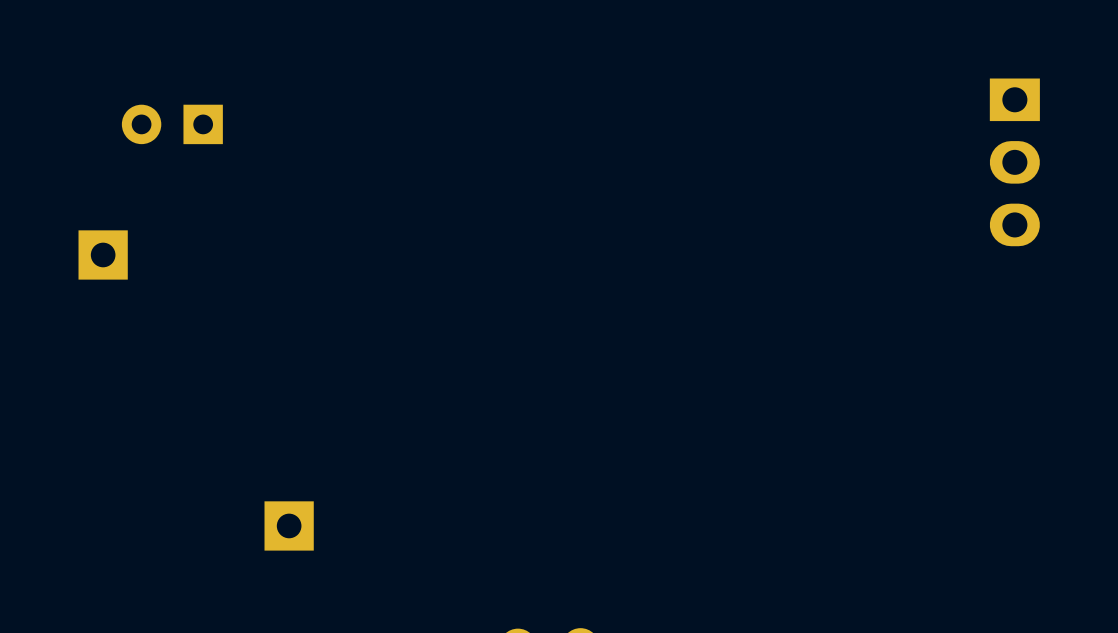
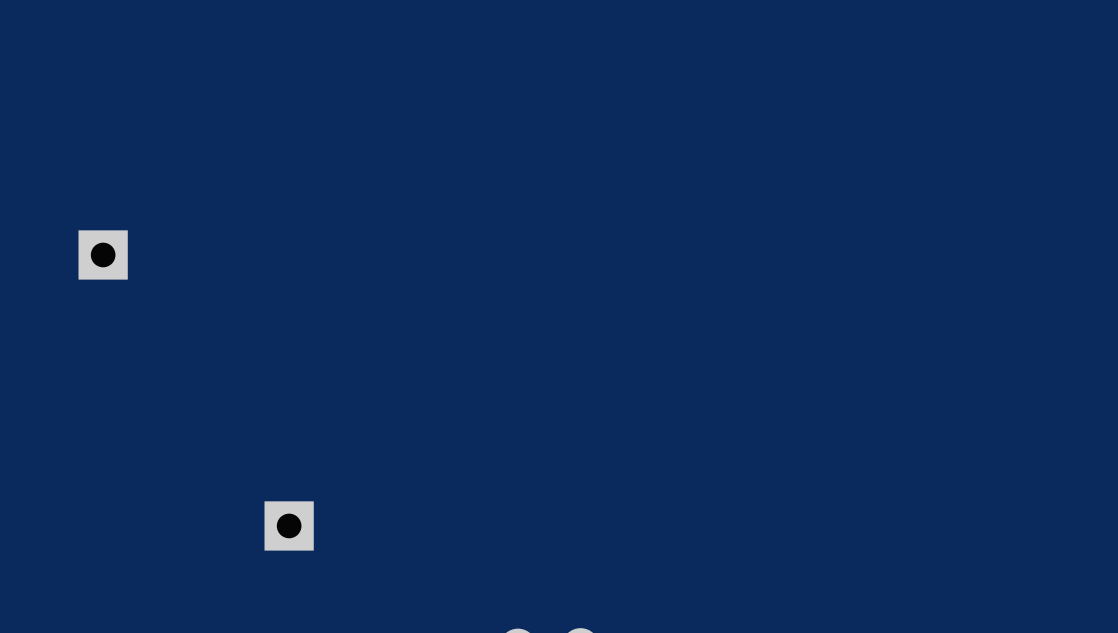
part: (172, 124) -> none
part: (1014, 162) -> none

